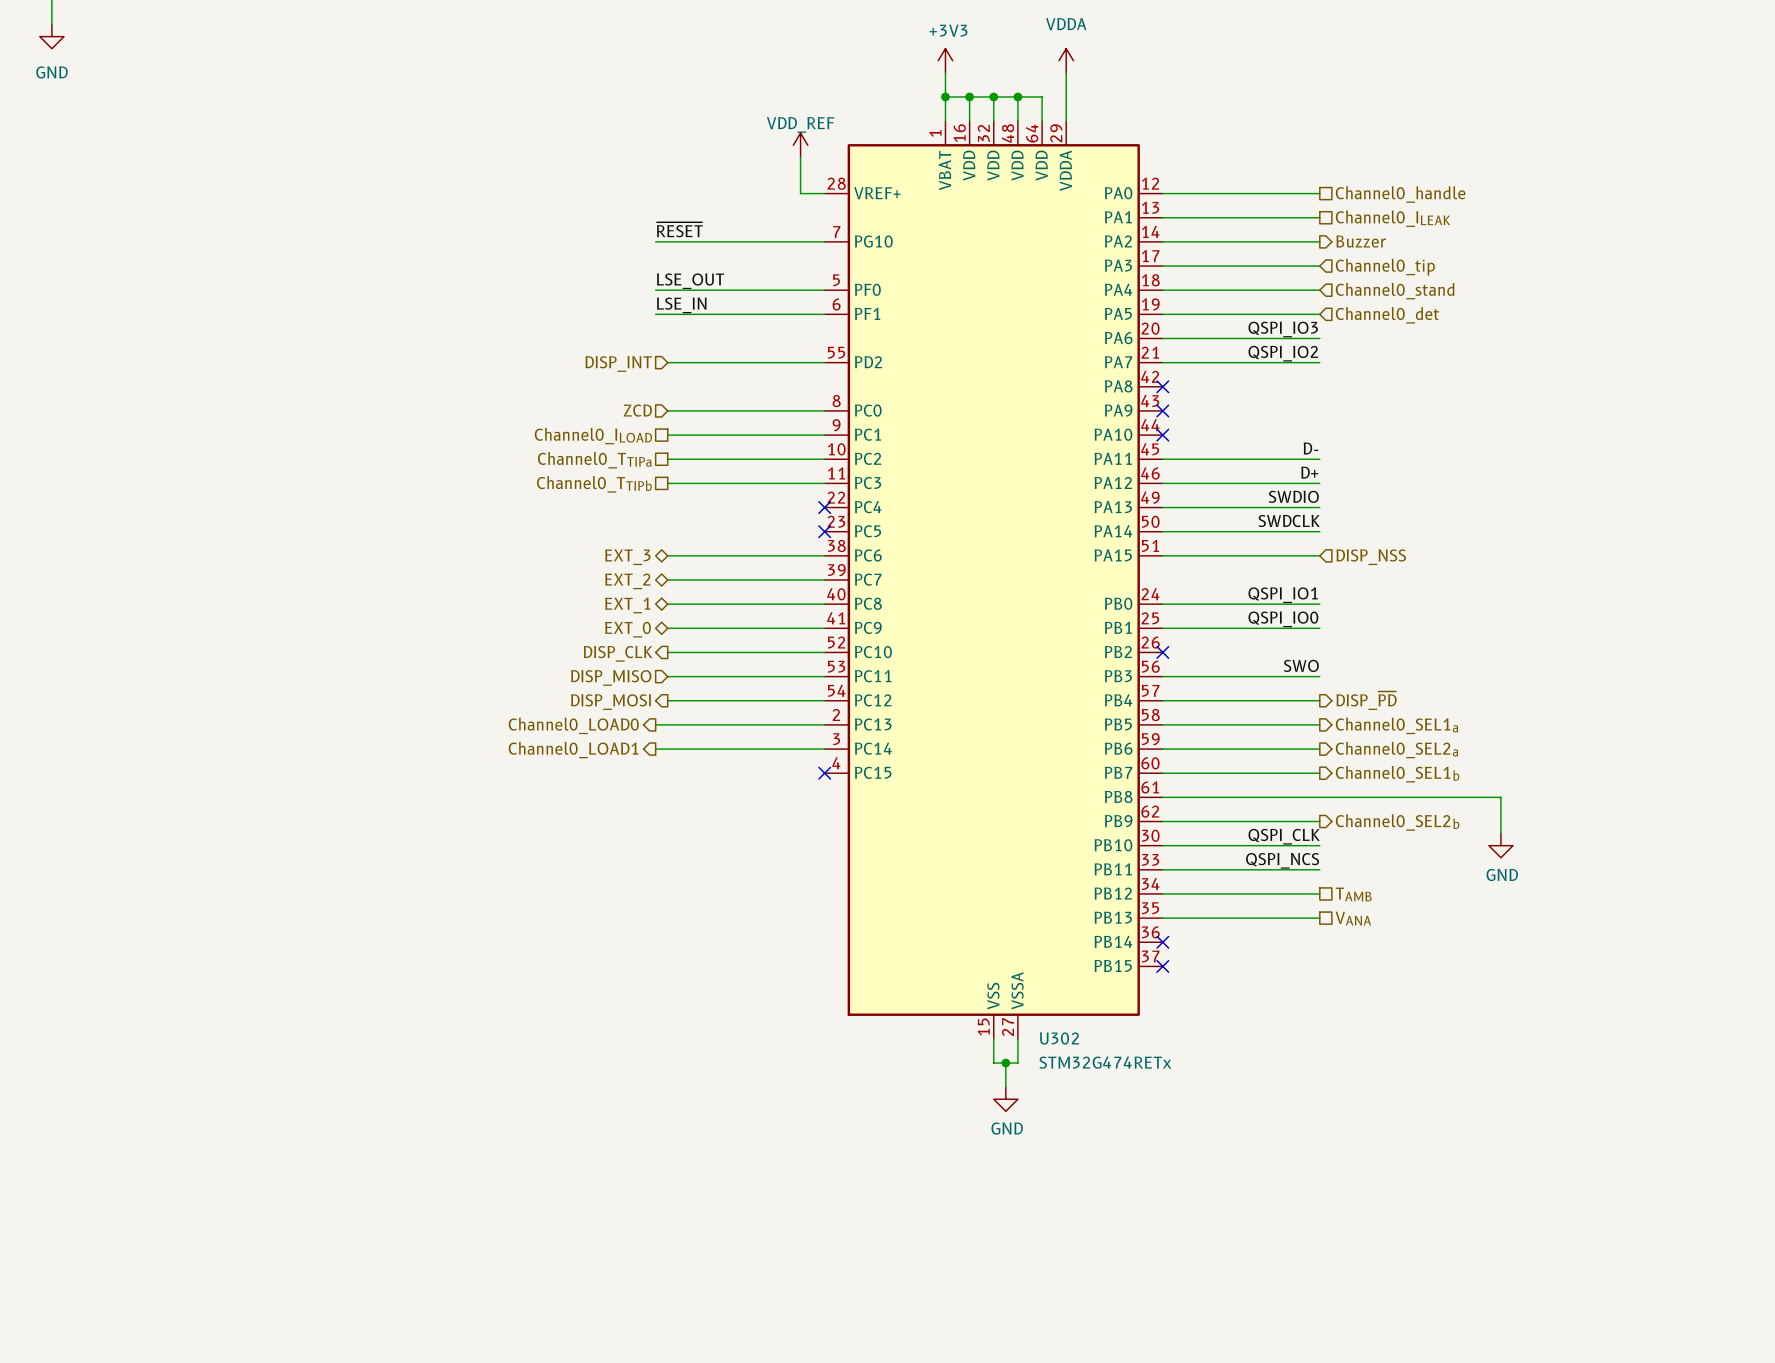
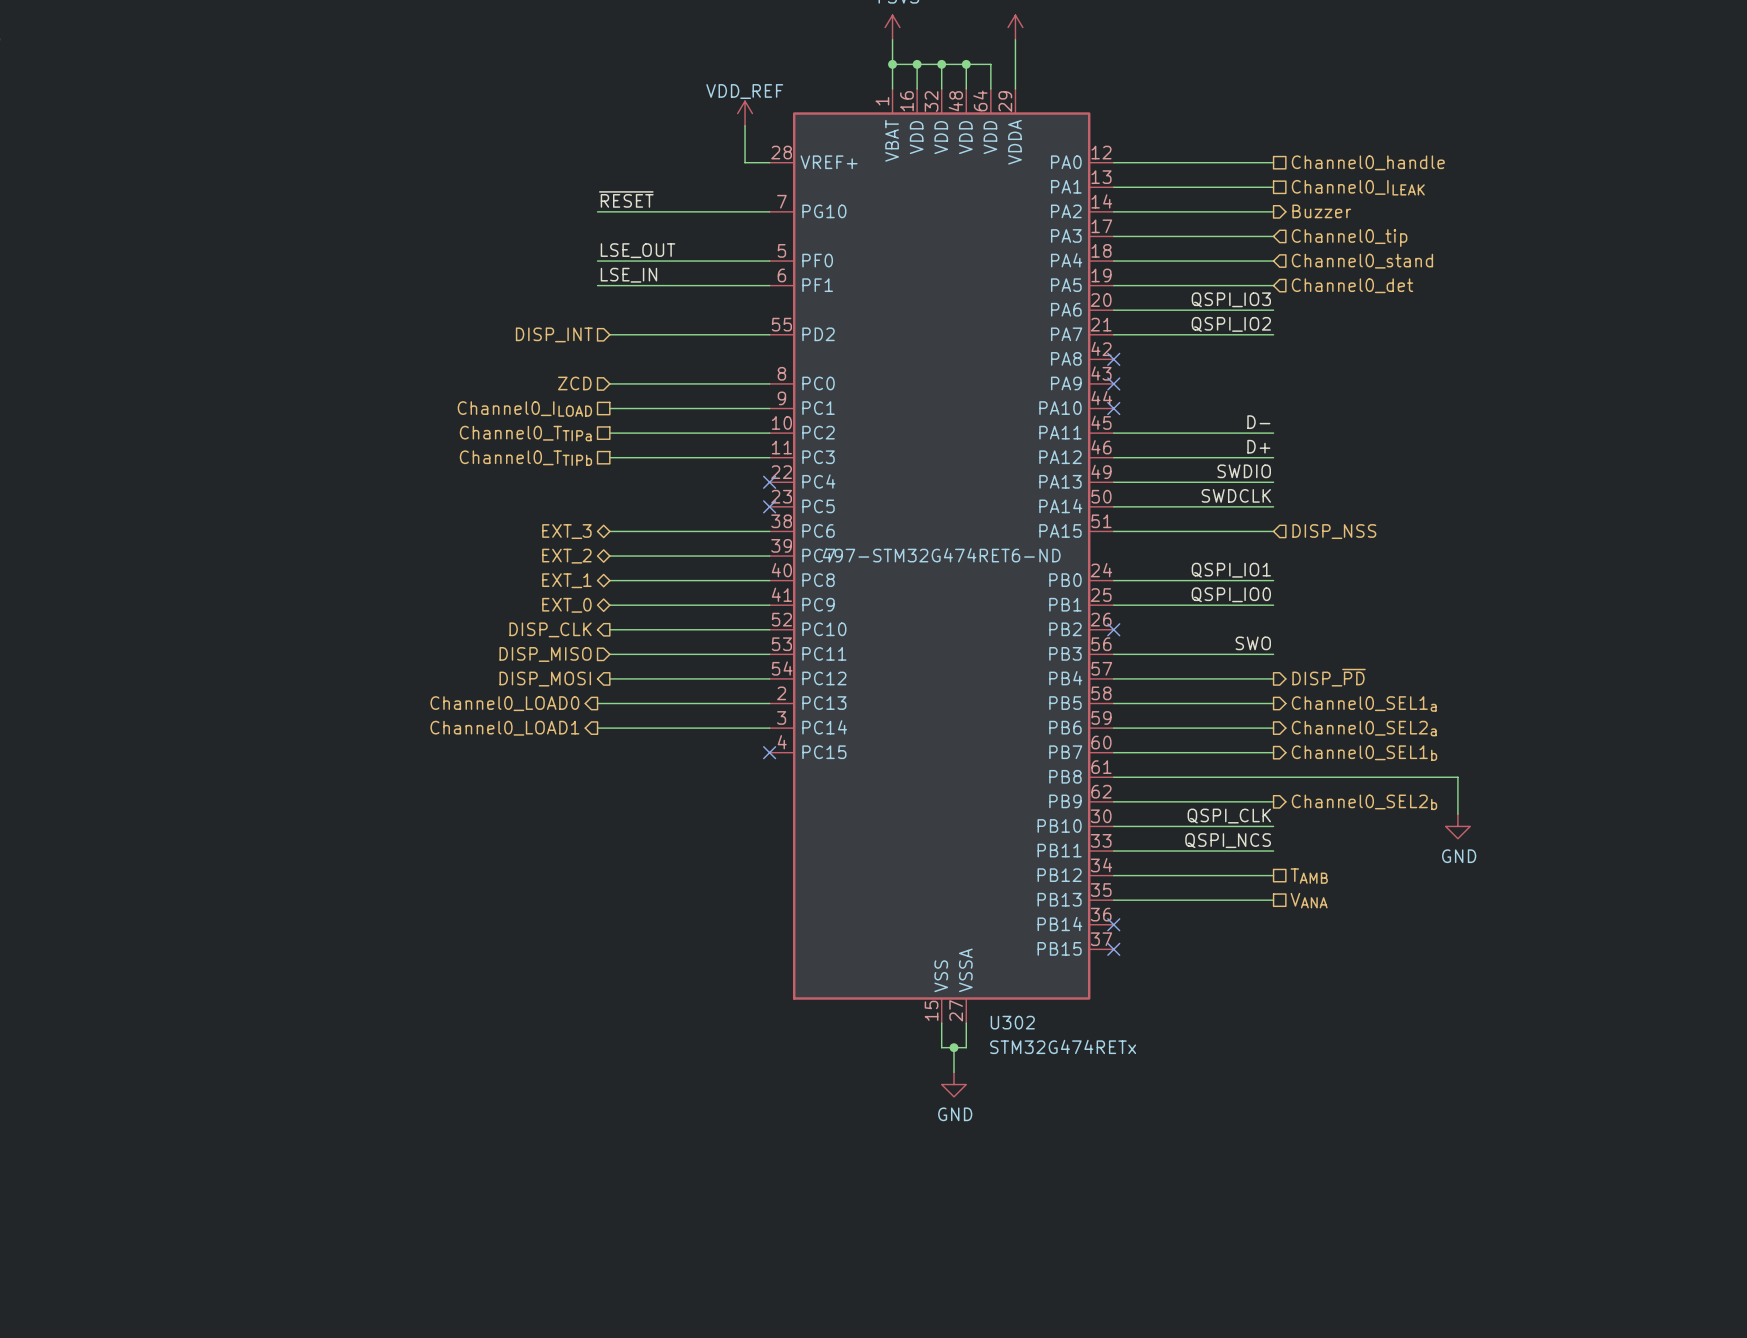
U302 text: none -> 497-STM32G474RET6-ND (941, 555)

